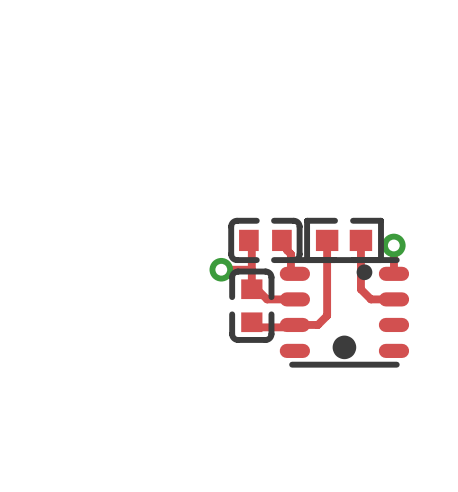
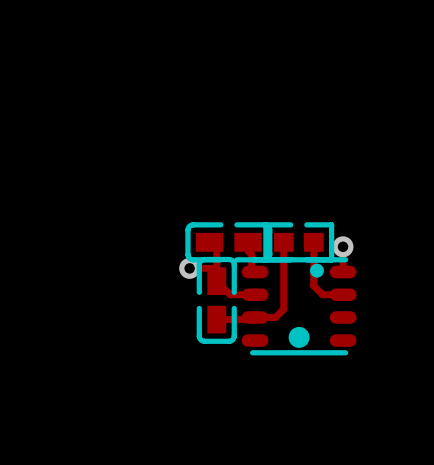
part footprint: [228, 217, 303, 264] -> [185, 222, 273, 263]
part footprint: [229, 268, 275, 343] -> [196, 256, 237, 344]

